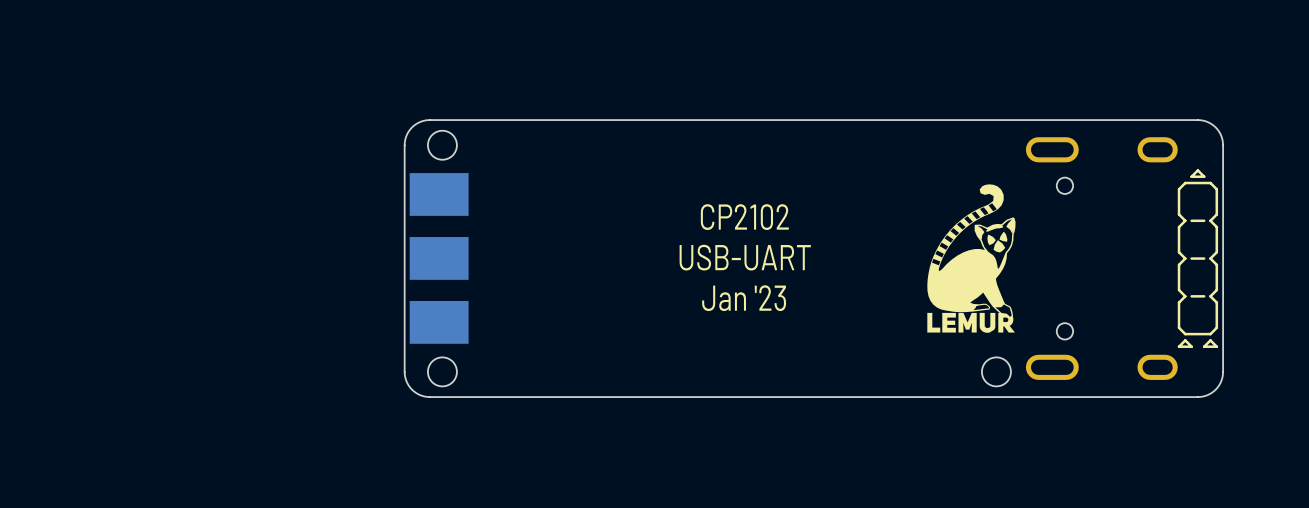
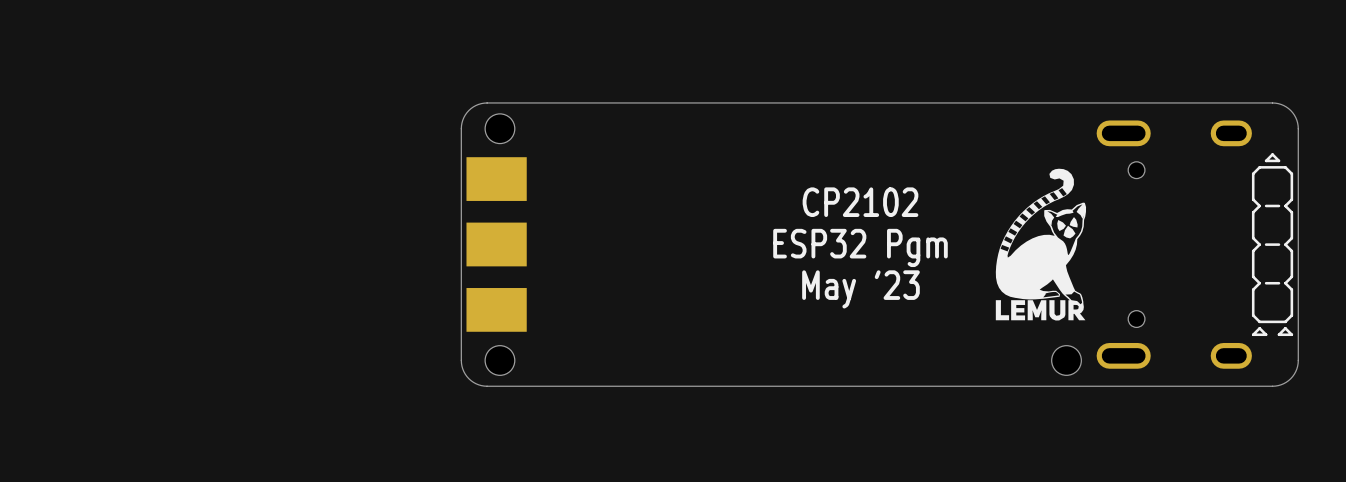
text position: CP2102 (744, 217) -> CP2102 (860, 202)
text: USB-UART (745, 257) -> none
text: none -> ESP32 Pgm (860, 247)
text: Jan '23 (744, 298) -> May '23 (860, 289)

